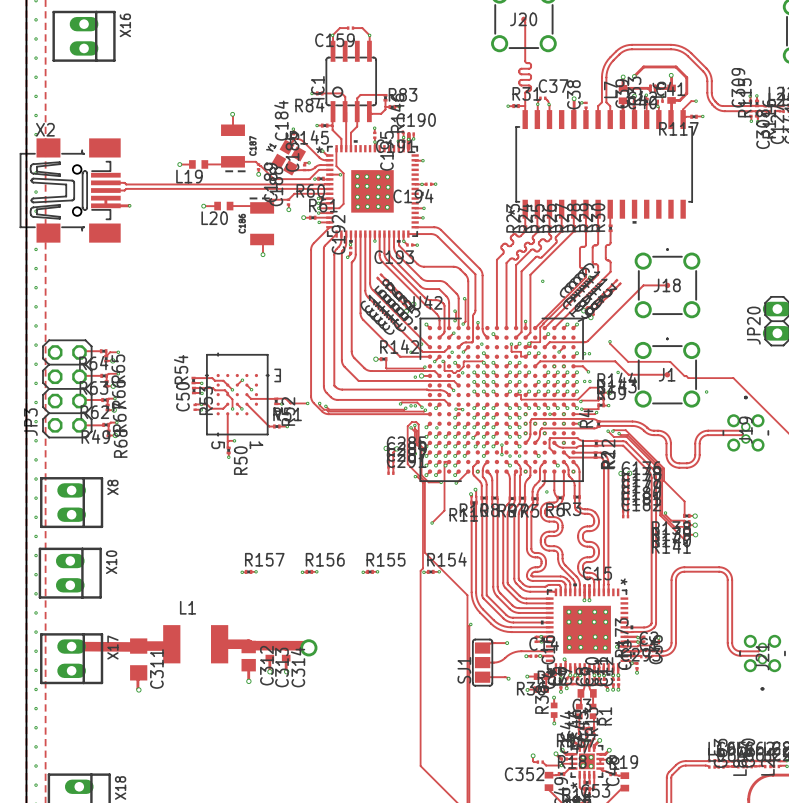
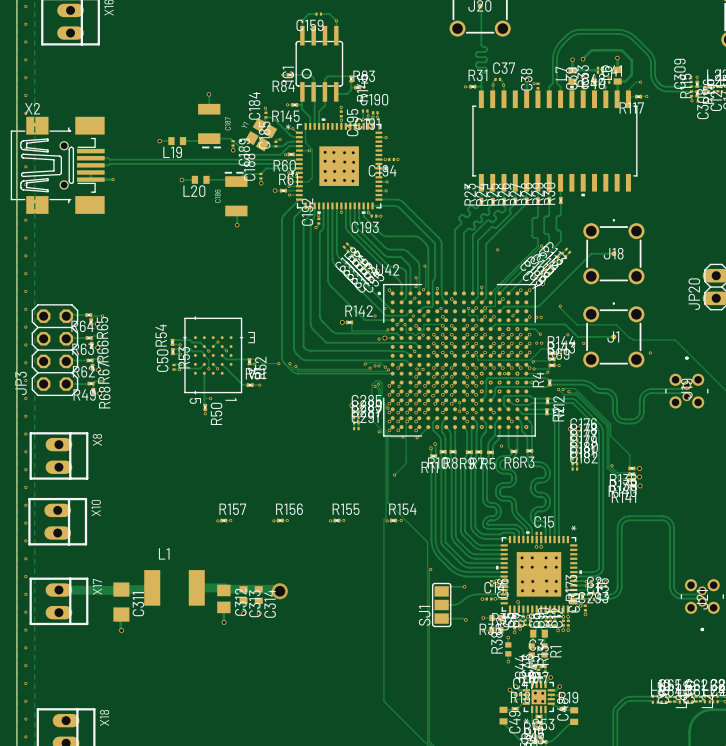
track: (533, 755) (532, 761) (537, 762) -> none
via: (533, 755) -> none
C352: (540, 762) -> none
track: (542, 762) (546, 765) (561, 765) -> none

